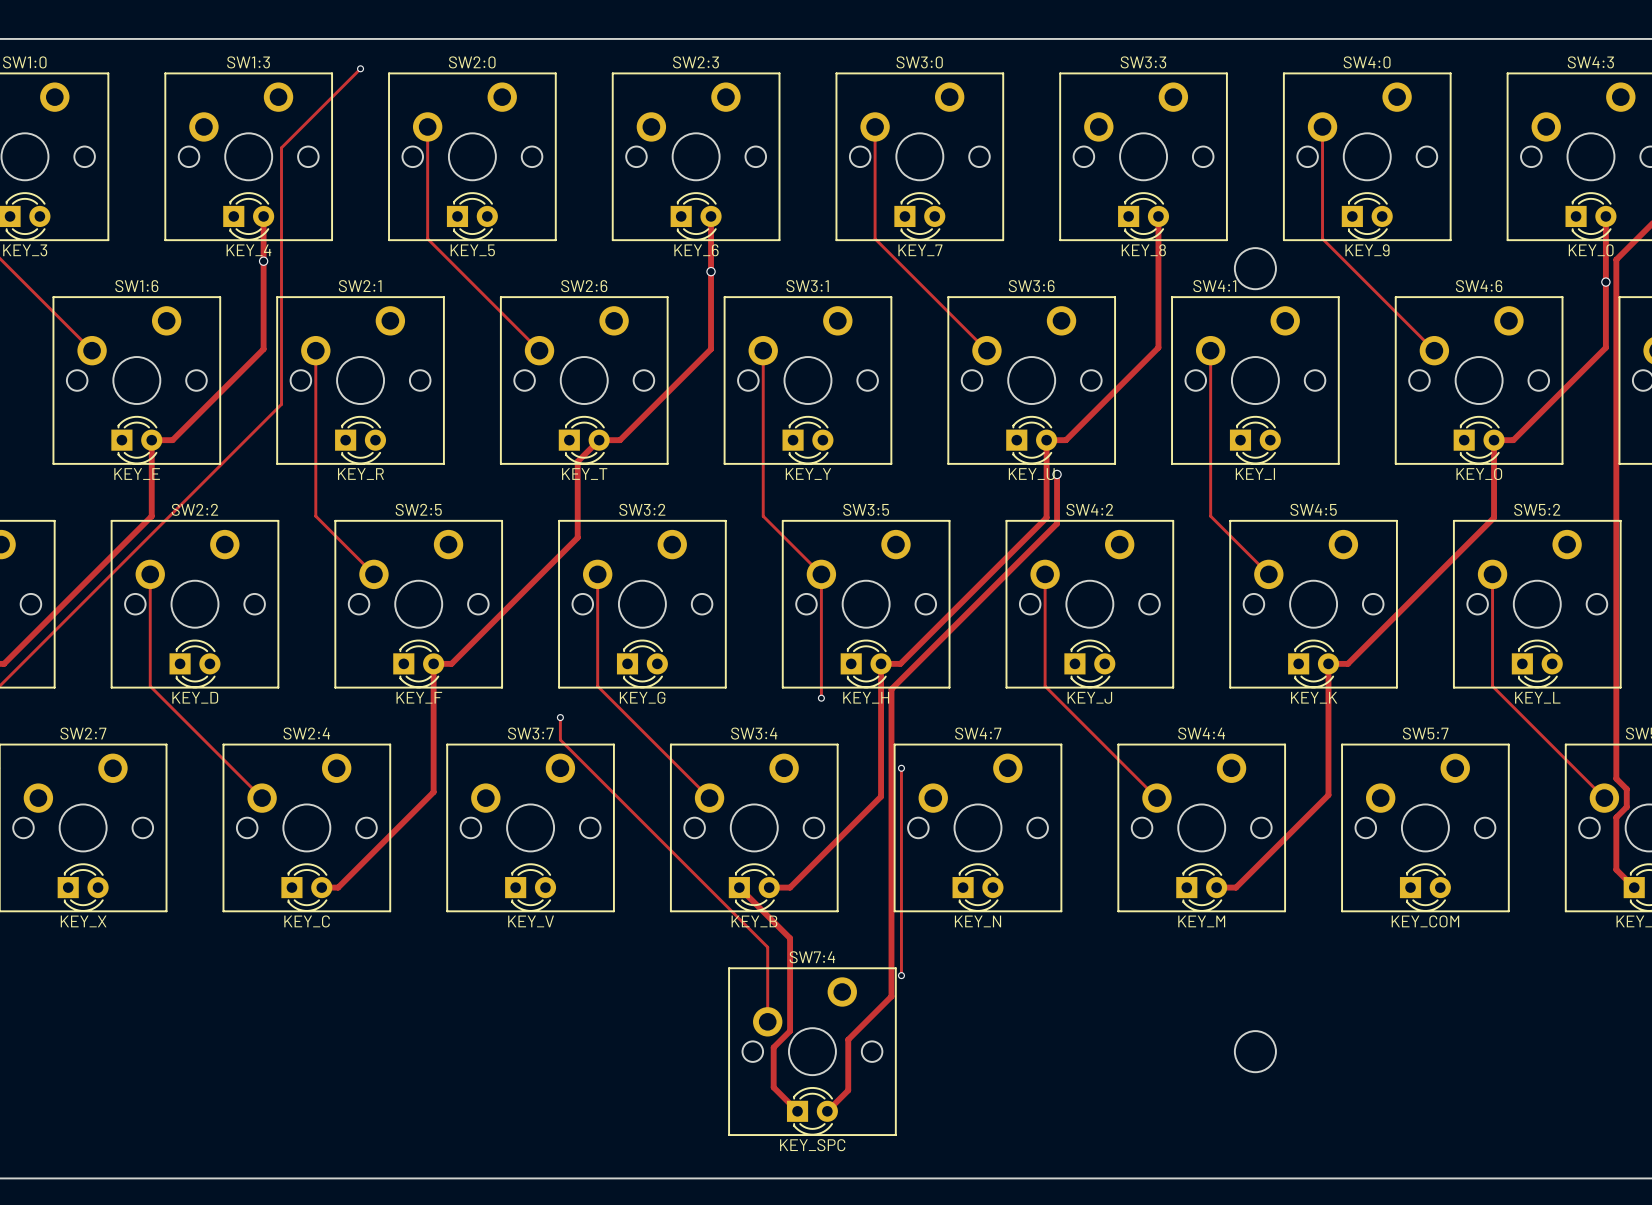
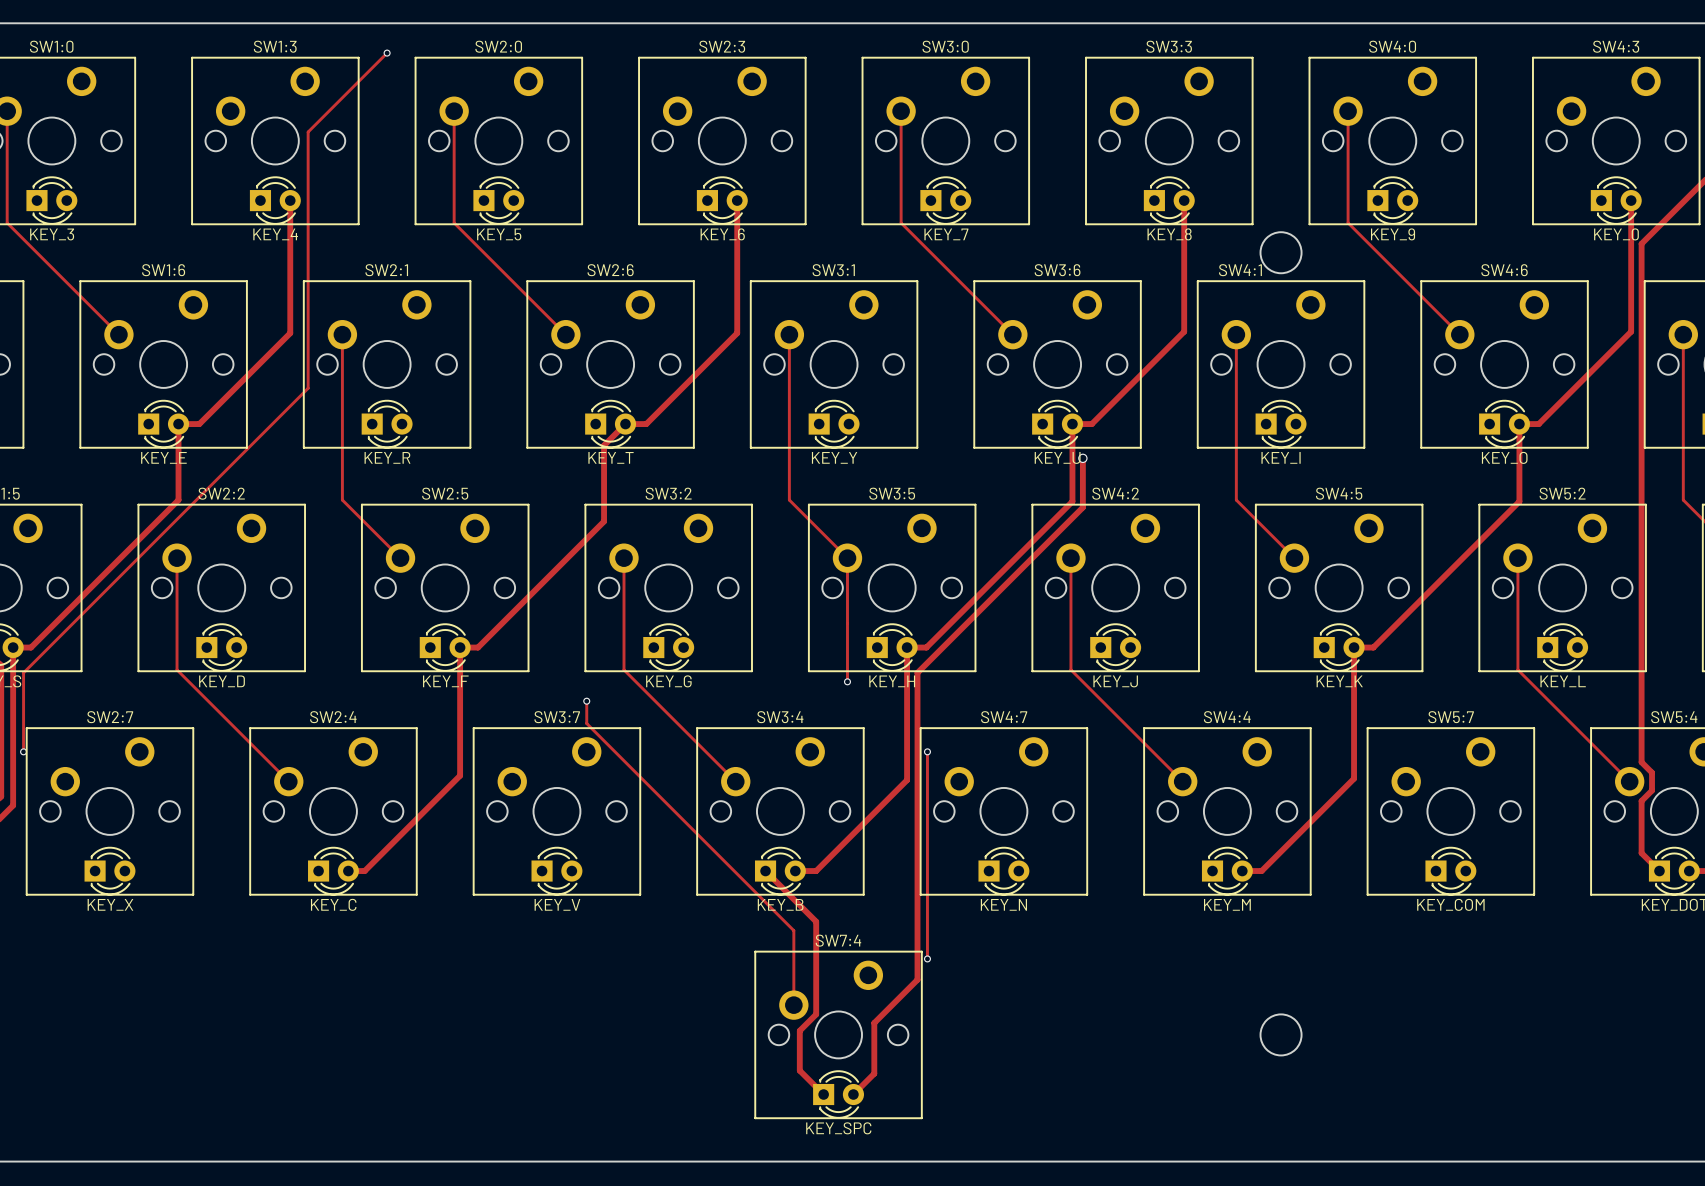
via: (263, 261) -> none
via: (711, 271) -> none
via: (1605, 282) -> none

